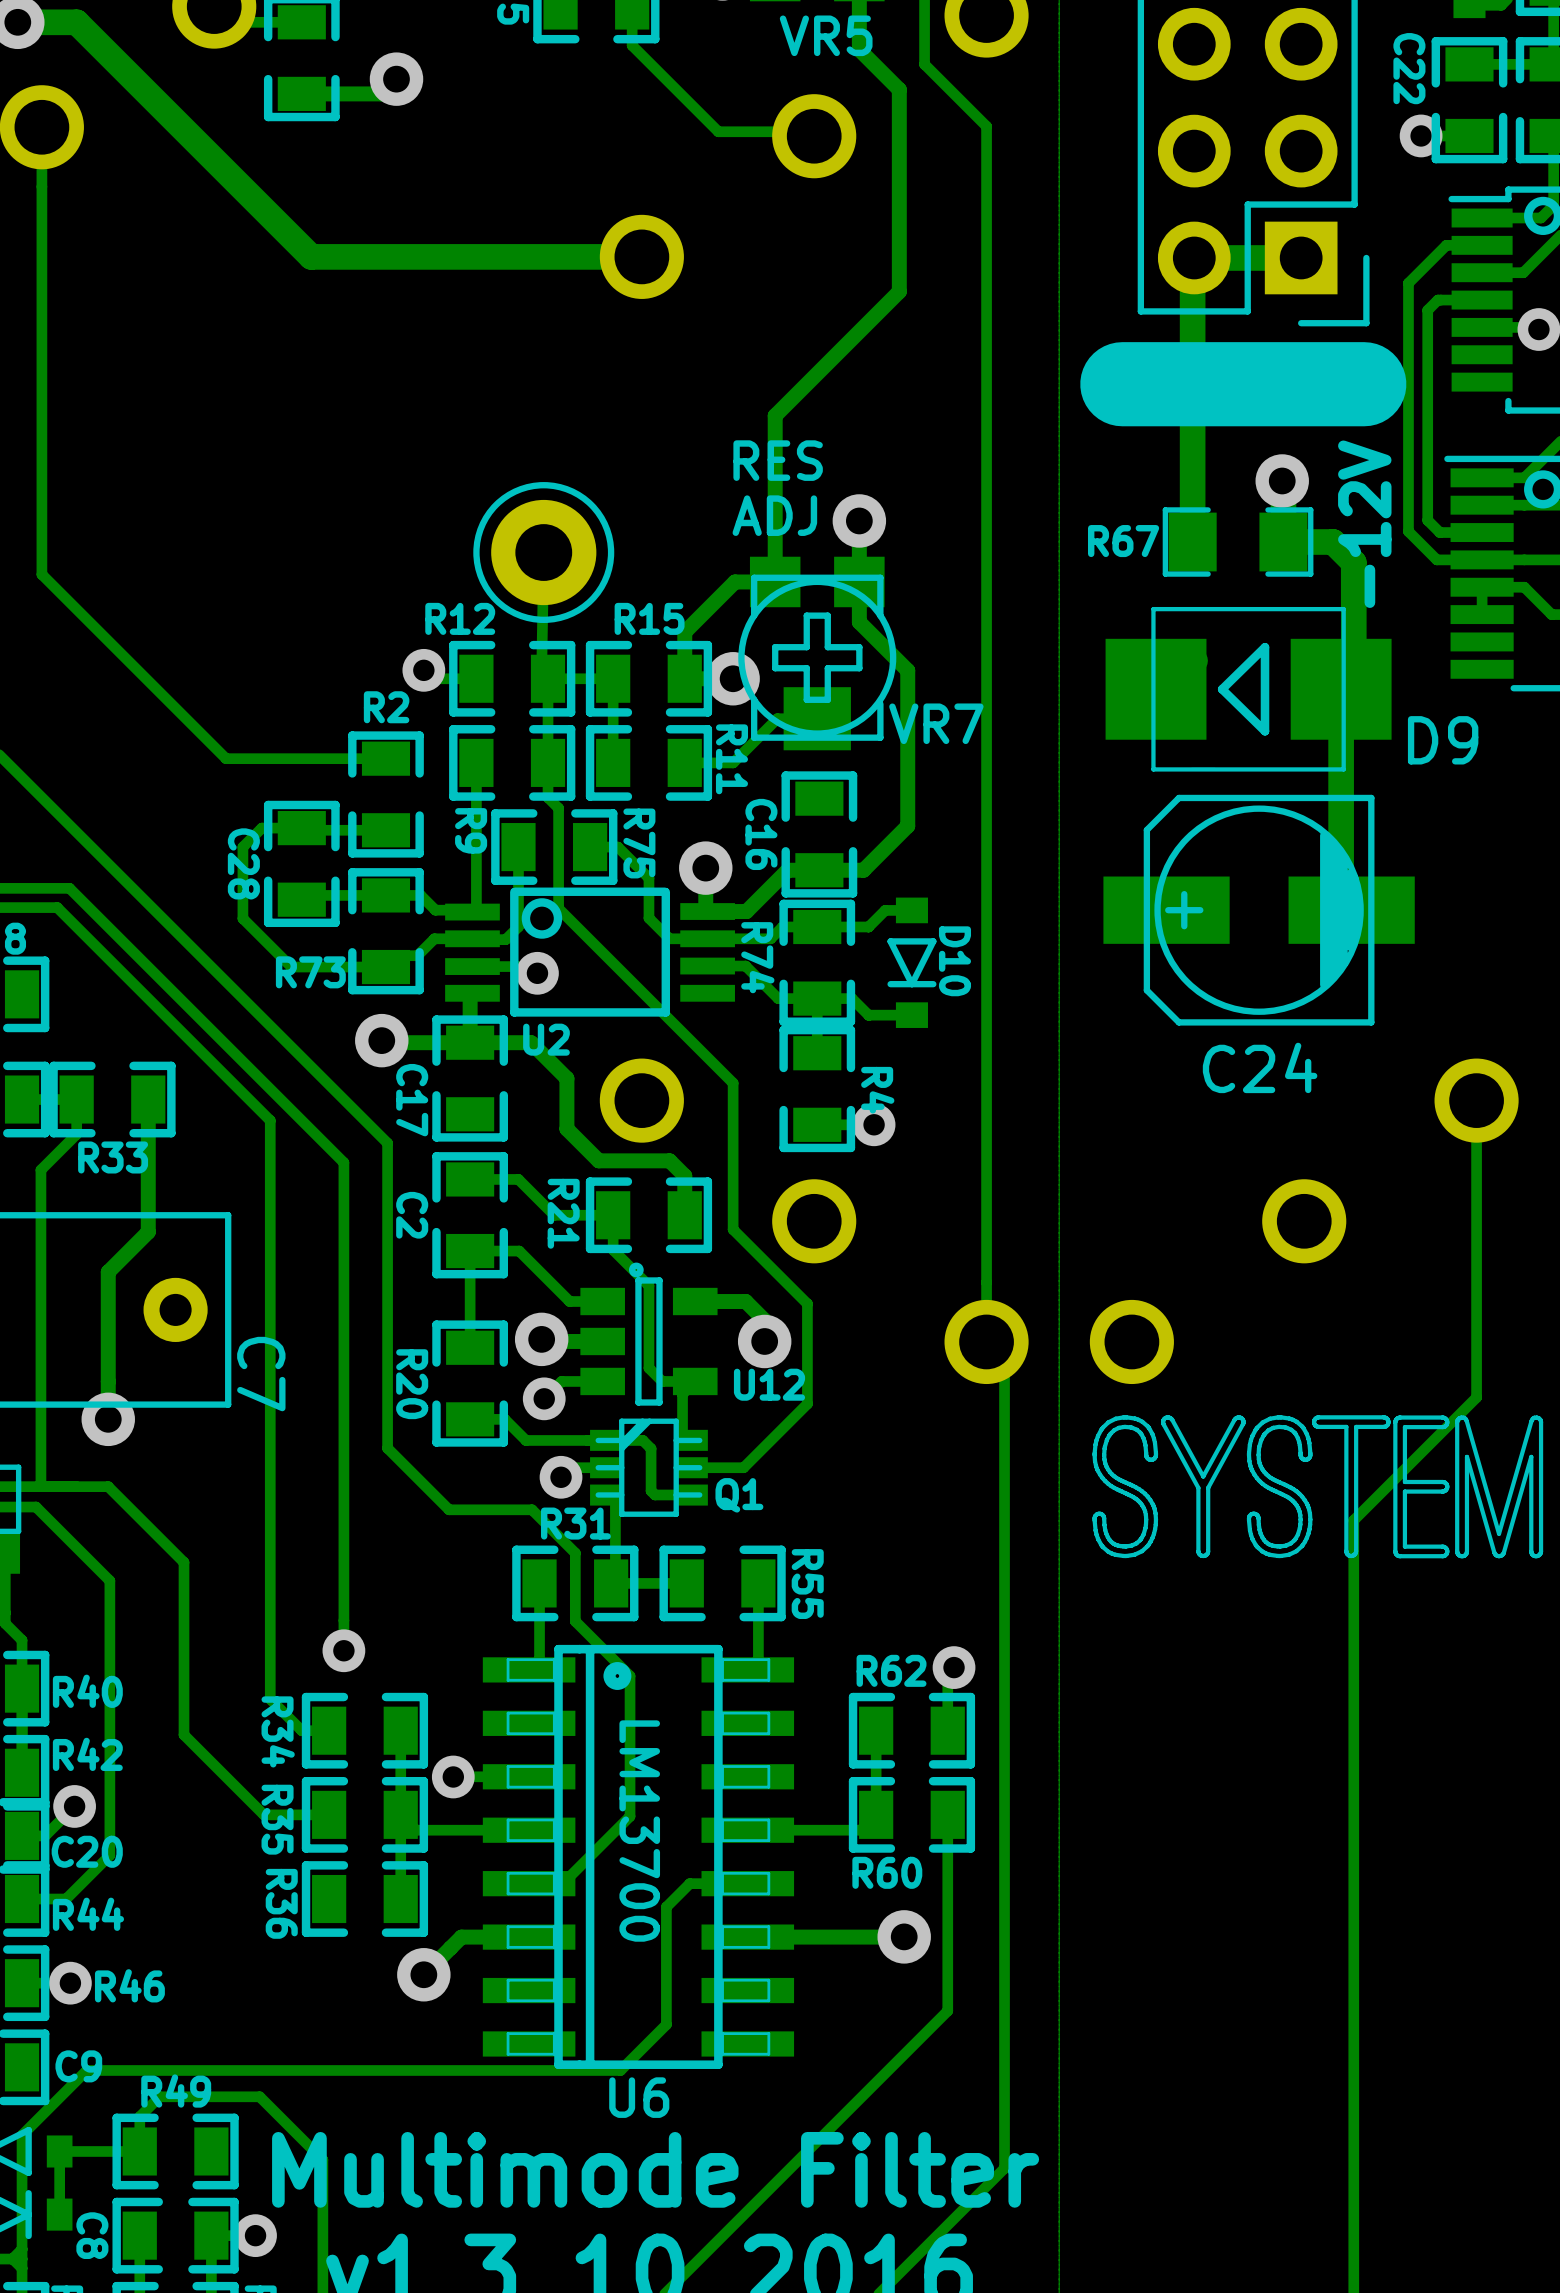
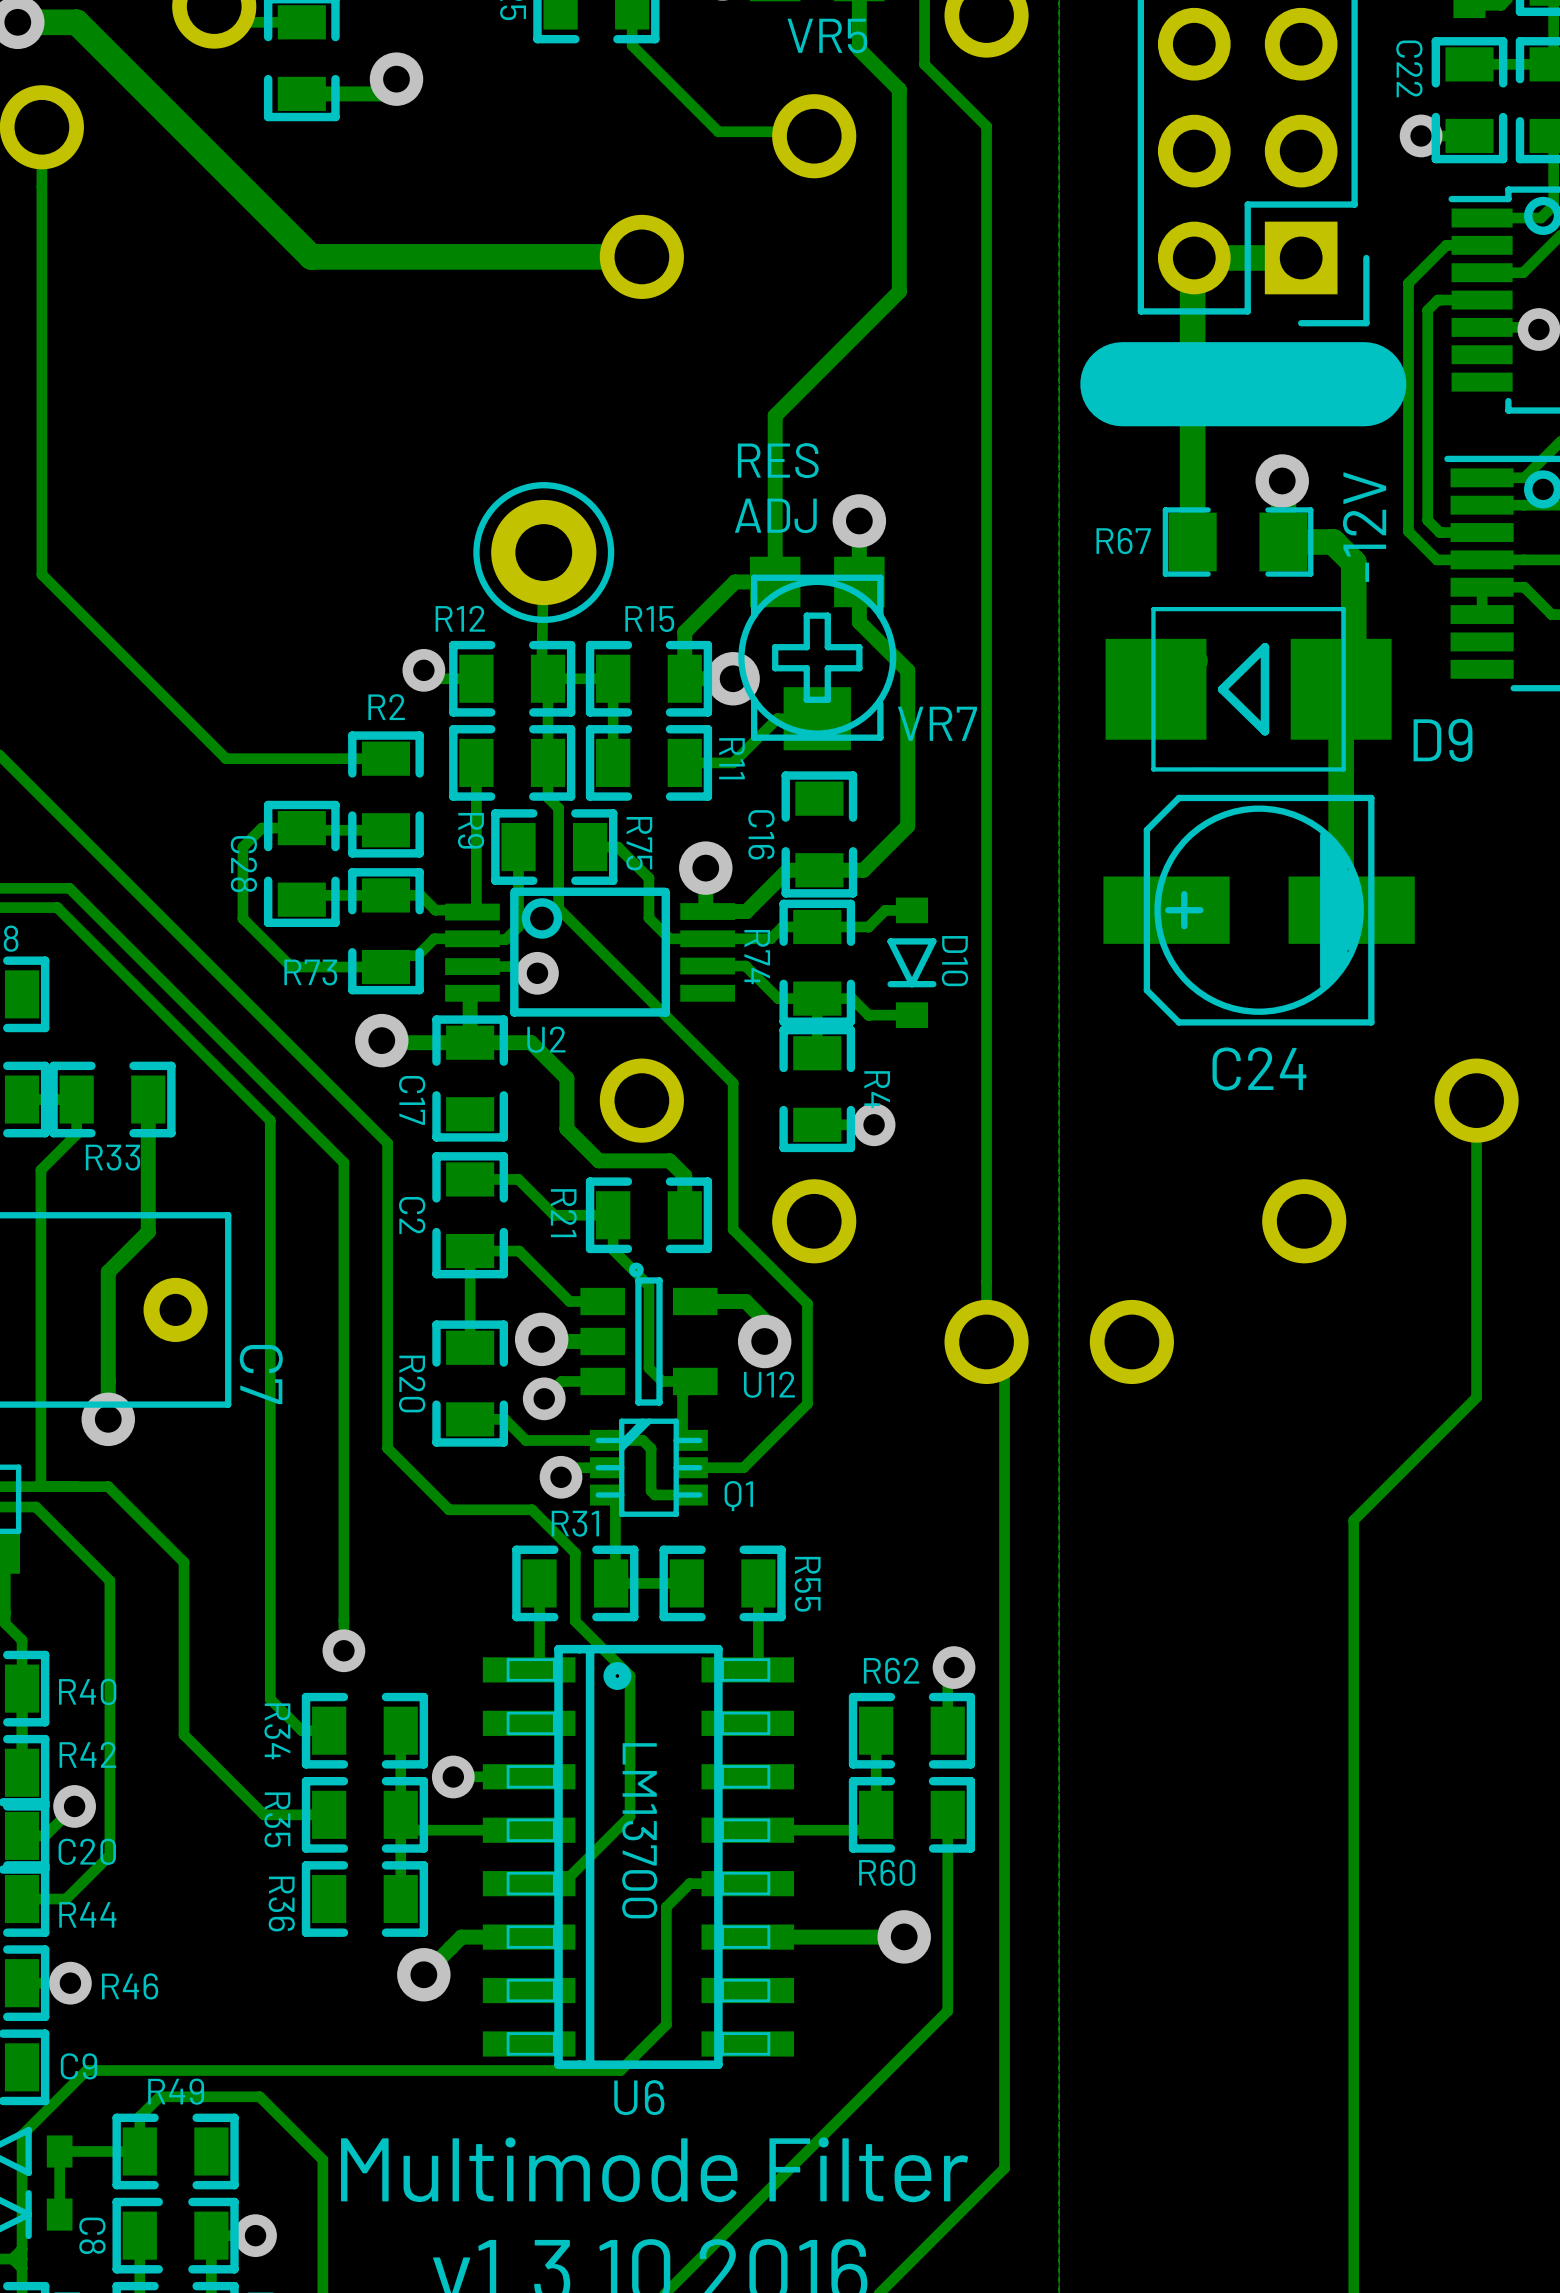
line: (1383, 1417) (1388, 1420) (1386, 1426) (1356, 1426) (1356, 1551) (1354, 1554) (1350, 1555) (1346, 1551) (1346, 1426) (1317, 1426) (1314, 1420) (1318, 1417) (1383, 1417) -> none
line: (1443, 1417) (1400, 1417) (1395, 1421) (1395, 1551) (1399, 1556) (1442, 1556) (1447, 1552) (1443, 1546) (1404, 1546) (1404, 1491) (1442, 1491) (1447, 1486) (1443, 1482) (1404, 1481) (1404, 1427) (1443, 1427) (1447, 1422) (1443, 1417) -> none
line: (1536, 1417) (1541, 1422) (1540, 1553) (1535, 1556) (1531, 1552) (1531, 1456) (1503, 1552) (1499, 1556) (1494, 1552) (1466, 1456) (1466, 1551) (1464, 1555) (1459, 1555) (1457, 1551) (1457, 1419) (1463, 1417) (1466, 1420) (1499, 1533) (1531, 1420) (1536, 1417) -> none
line: (1172, 1419) (1203, 1476) (1234, 1419) (1239, 1417) (1243, 1420) (1208, 1487) (1208, 1551) (1204, 1555) (1200, 1555) (1198, 1551) (1198, 1487) (1163, 1423) (1165, 1417) (1172, 1419) -> none
line: (1140, 1432) (1130, 1427) (1118, 1427) (1114, 1430) (1106, 1440) (1104, 1459) (1111, 1474) (1138, 1489) (1150, 1500) (1155, 1513) (1155, 1529) (1150, 1541) (1142, 1551) (1126, 1555) (1115, 1554) (1102, 1547) (1098, 1539) (1095, 1515) (1099, 1513) (1103, 1516) (1106, 1533) (1111, 1541) (1125, 1546) (1136, 1543) (1141, 1538) (1145, 1528) (1145, 1515) (1138, 1500) (1111, 1486) (1102, 1478) (1094, 1461) (1095, 1444) (1101, 1429) (1108, 1422) (1123, 1417) (1134, 1418) (1147, 1426) (1152, 1433) (1155, 1453) (1153, 1459) (1149, 1459) (1146, 1457) (1144, 1442) (1140, 1433) -> none
line: (1294, 1432) (1284, 1427) (1273, 1427) (1268, 1430) (1261, 1440) (1258, 1459) (1266, 1474) (1293, 1489) (1304, 1500) (1309, 1513) (1309, 1529) (1304, 1541) (1296, 1551) (1281, 1555) (1269, 1554) (1257, 1547) (1252, 1539) (1249, 1515) (1253, 1513) (1257, 1516) (1260, 1533) (1265, 1541) (1279, 1546) (1290, 1543) (1295, 1538) (1299, 1528) (1300, 1515) (1292, 1500) (1265, 1486) (1256, 1478) (1249, 1461) (1249, 1444) (1255, 1429) (1262, 1422) (1278, 1417) (1289, 1418) (1301, 1426) (1306, 1433) (1310, 1453) (1308, 1459) (1304, 1459) (1301, 1457) (1299, 1442) (1295, 1433) -> none

